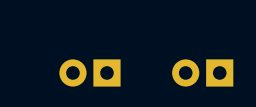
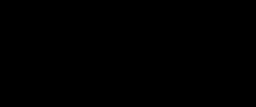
part: (89, 72) -> none
part: (202, 72) -> none

